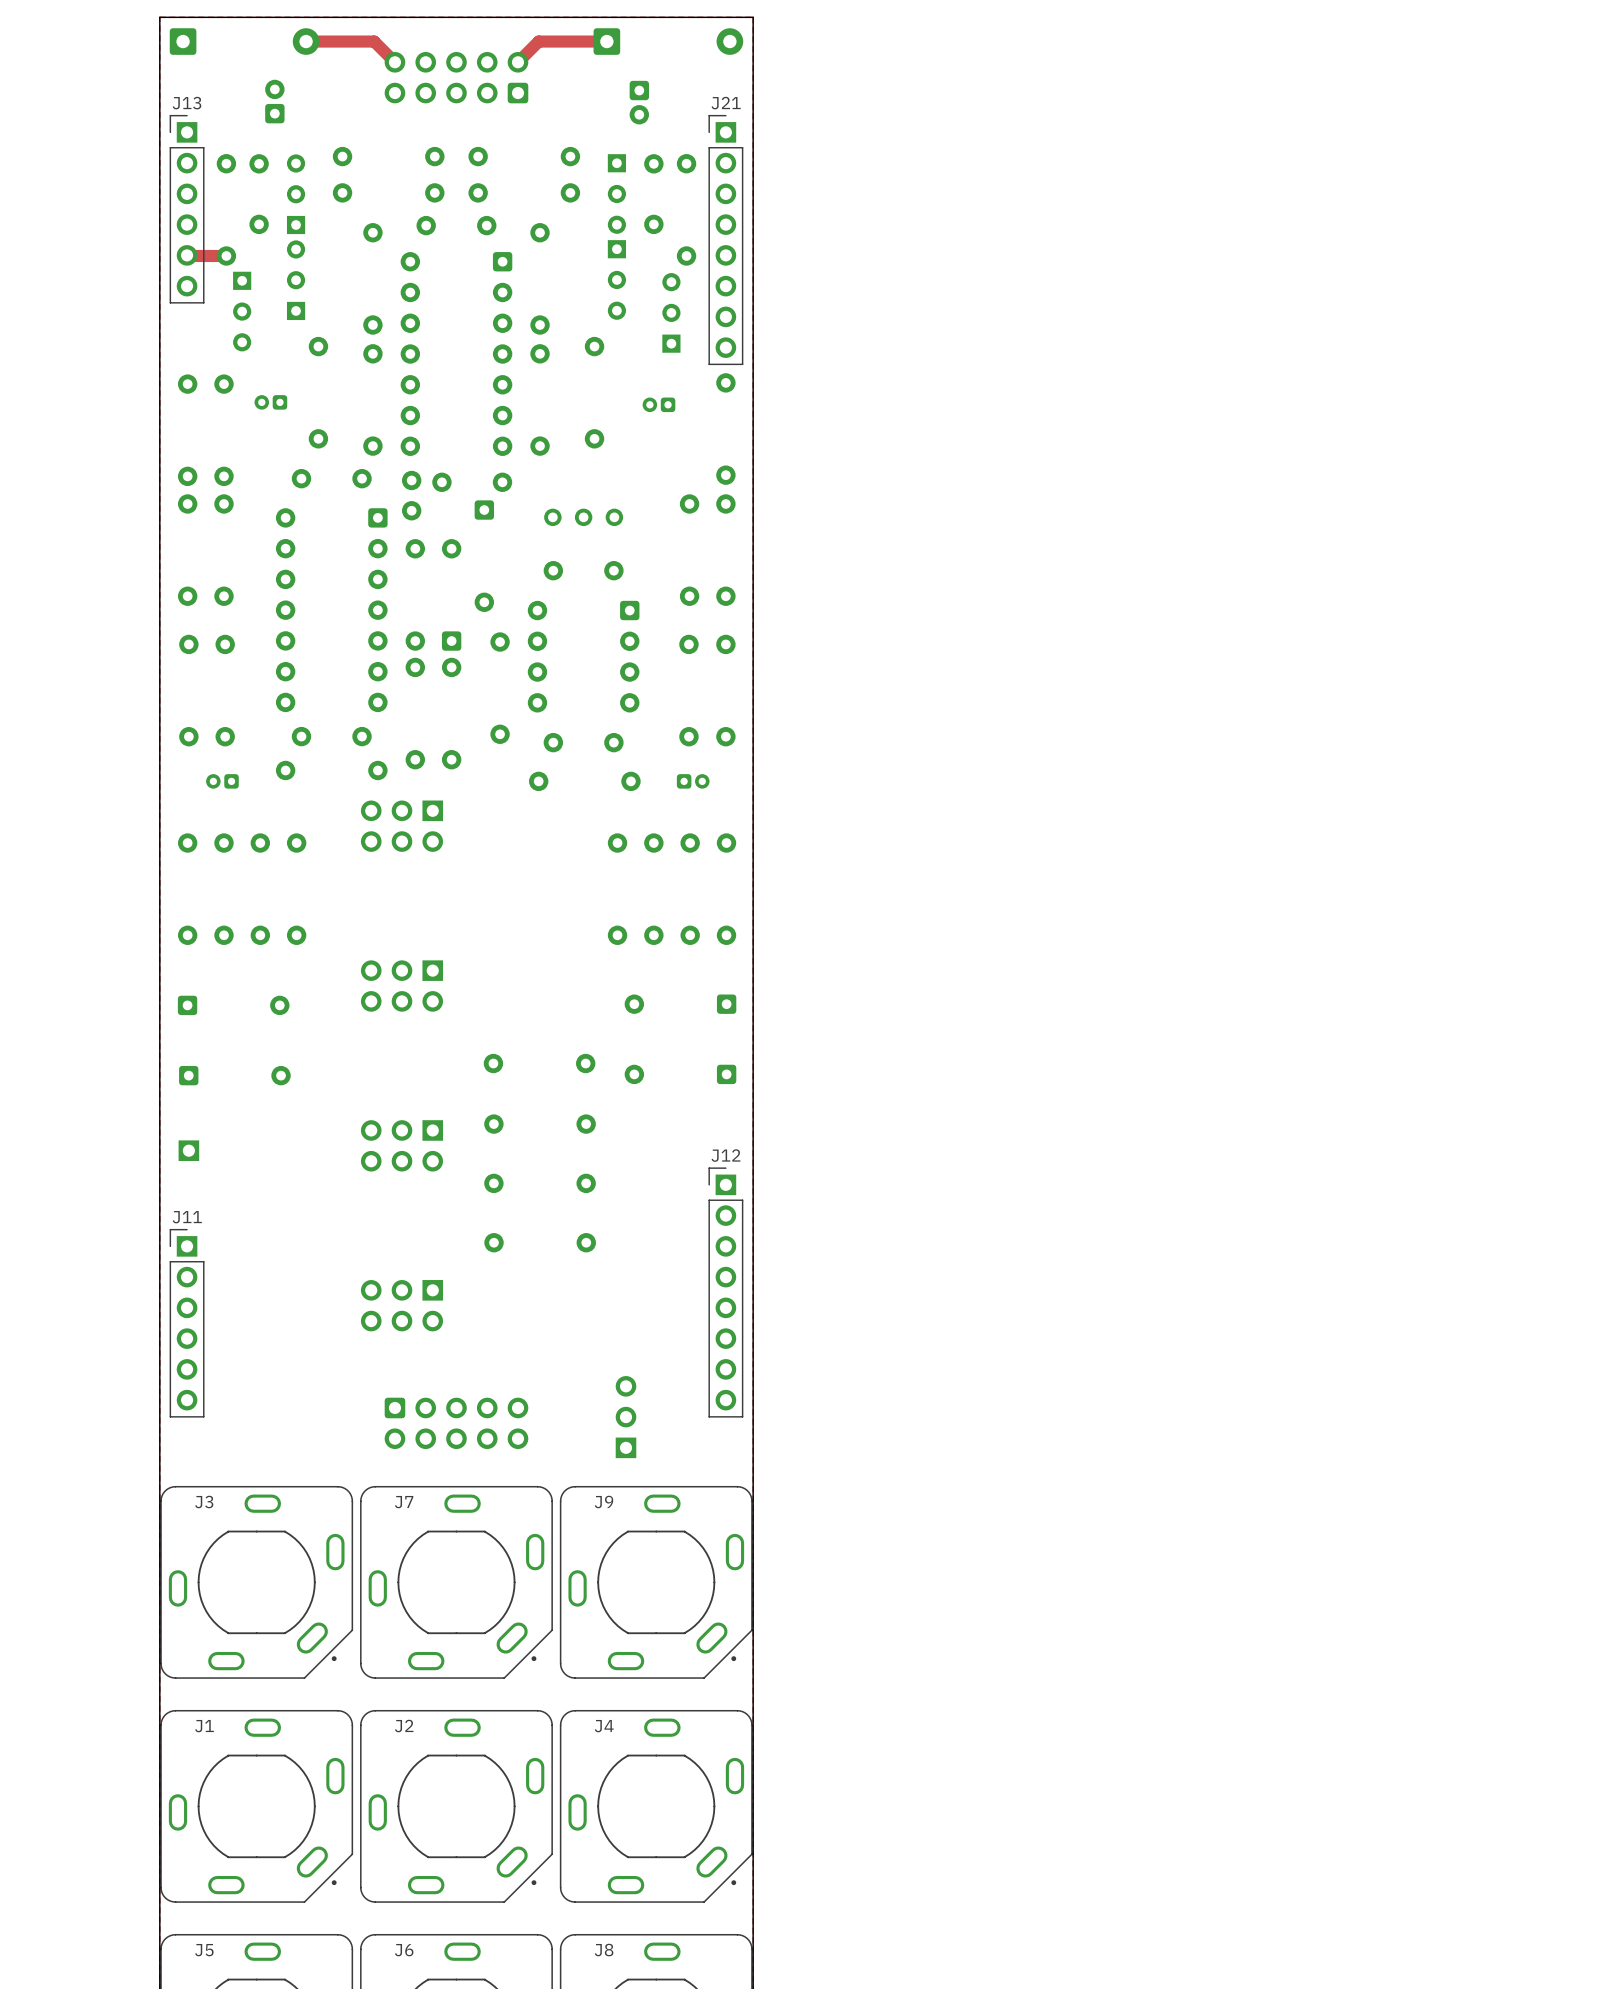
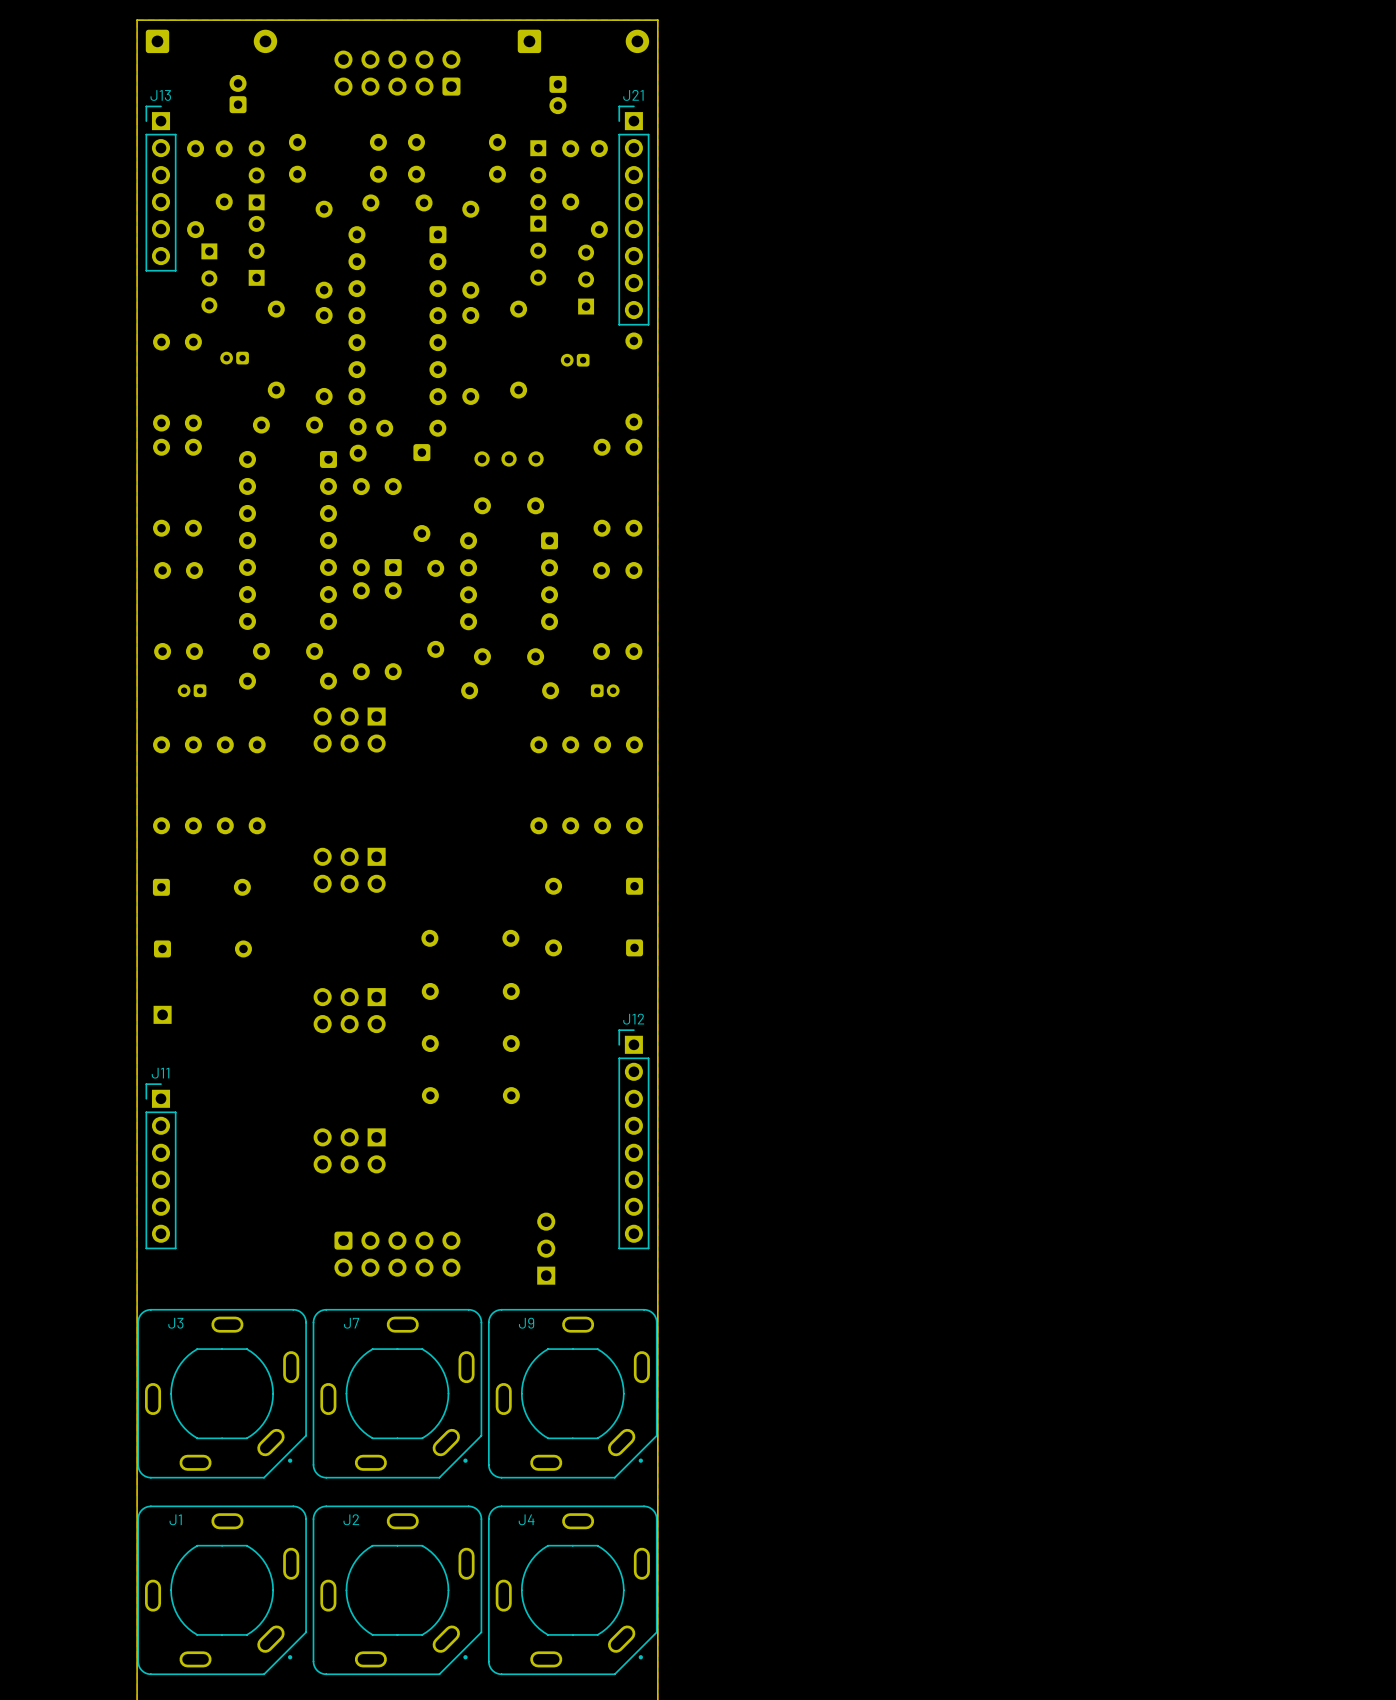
track: (306, 41) (374, 41) (394, 62) -> none
track: (606, 41) (538, 41) (517, 62) -> none
track: (187, 255) (226, 255) -> none

